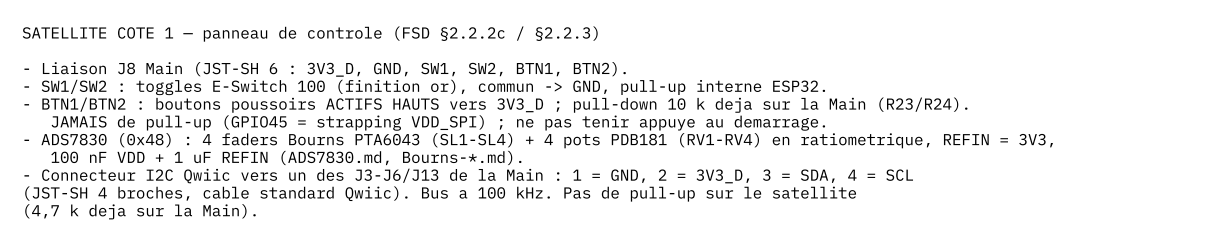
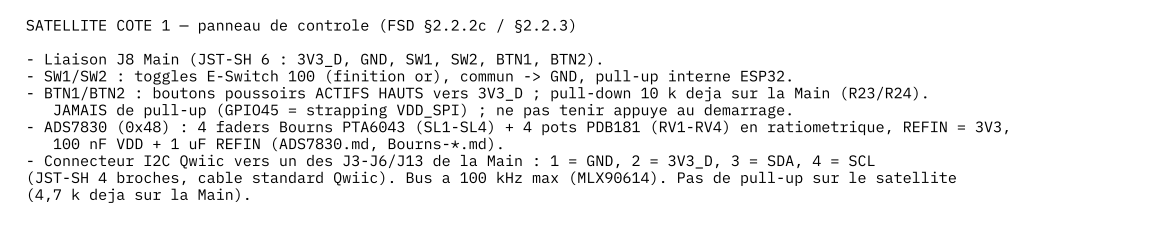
text: (JST-SH 4 broches, cable standard Qwiic). Bus a 100 kHz. Pas de pull-up sur le satellite (440, 194) -> (JST-SH 4 broches, cable standard Qwiic). Bus a 100 kHz max (MLX90614). Pas de pull-up sur le satellite (492, 178)

